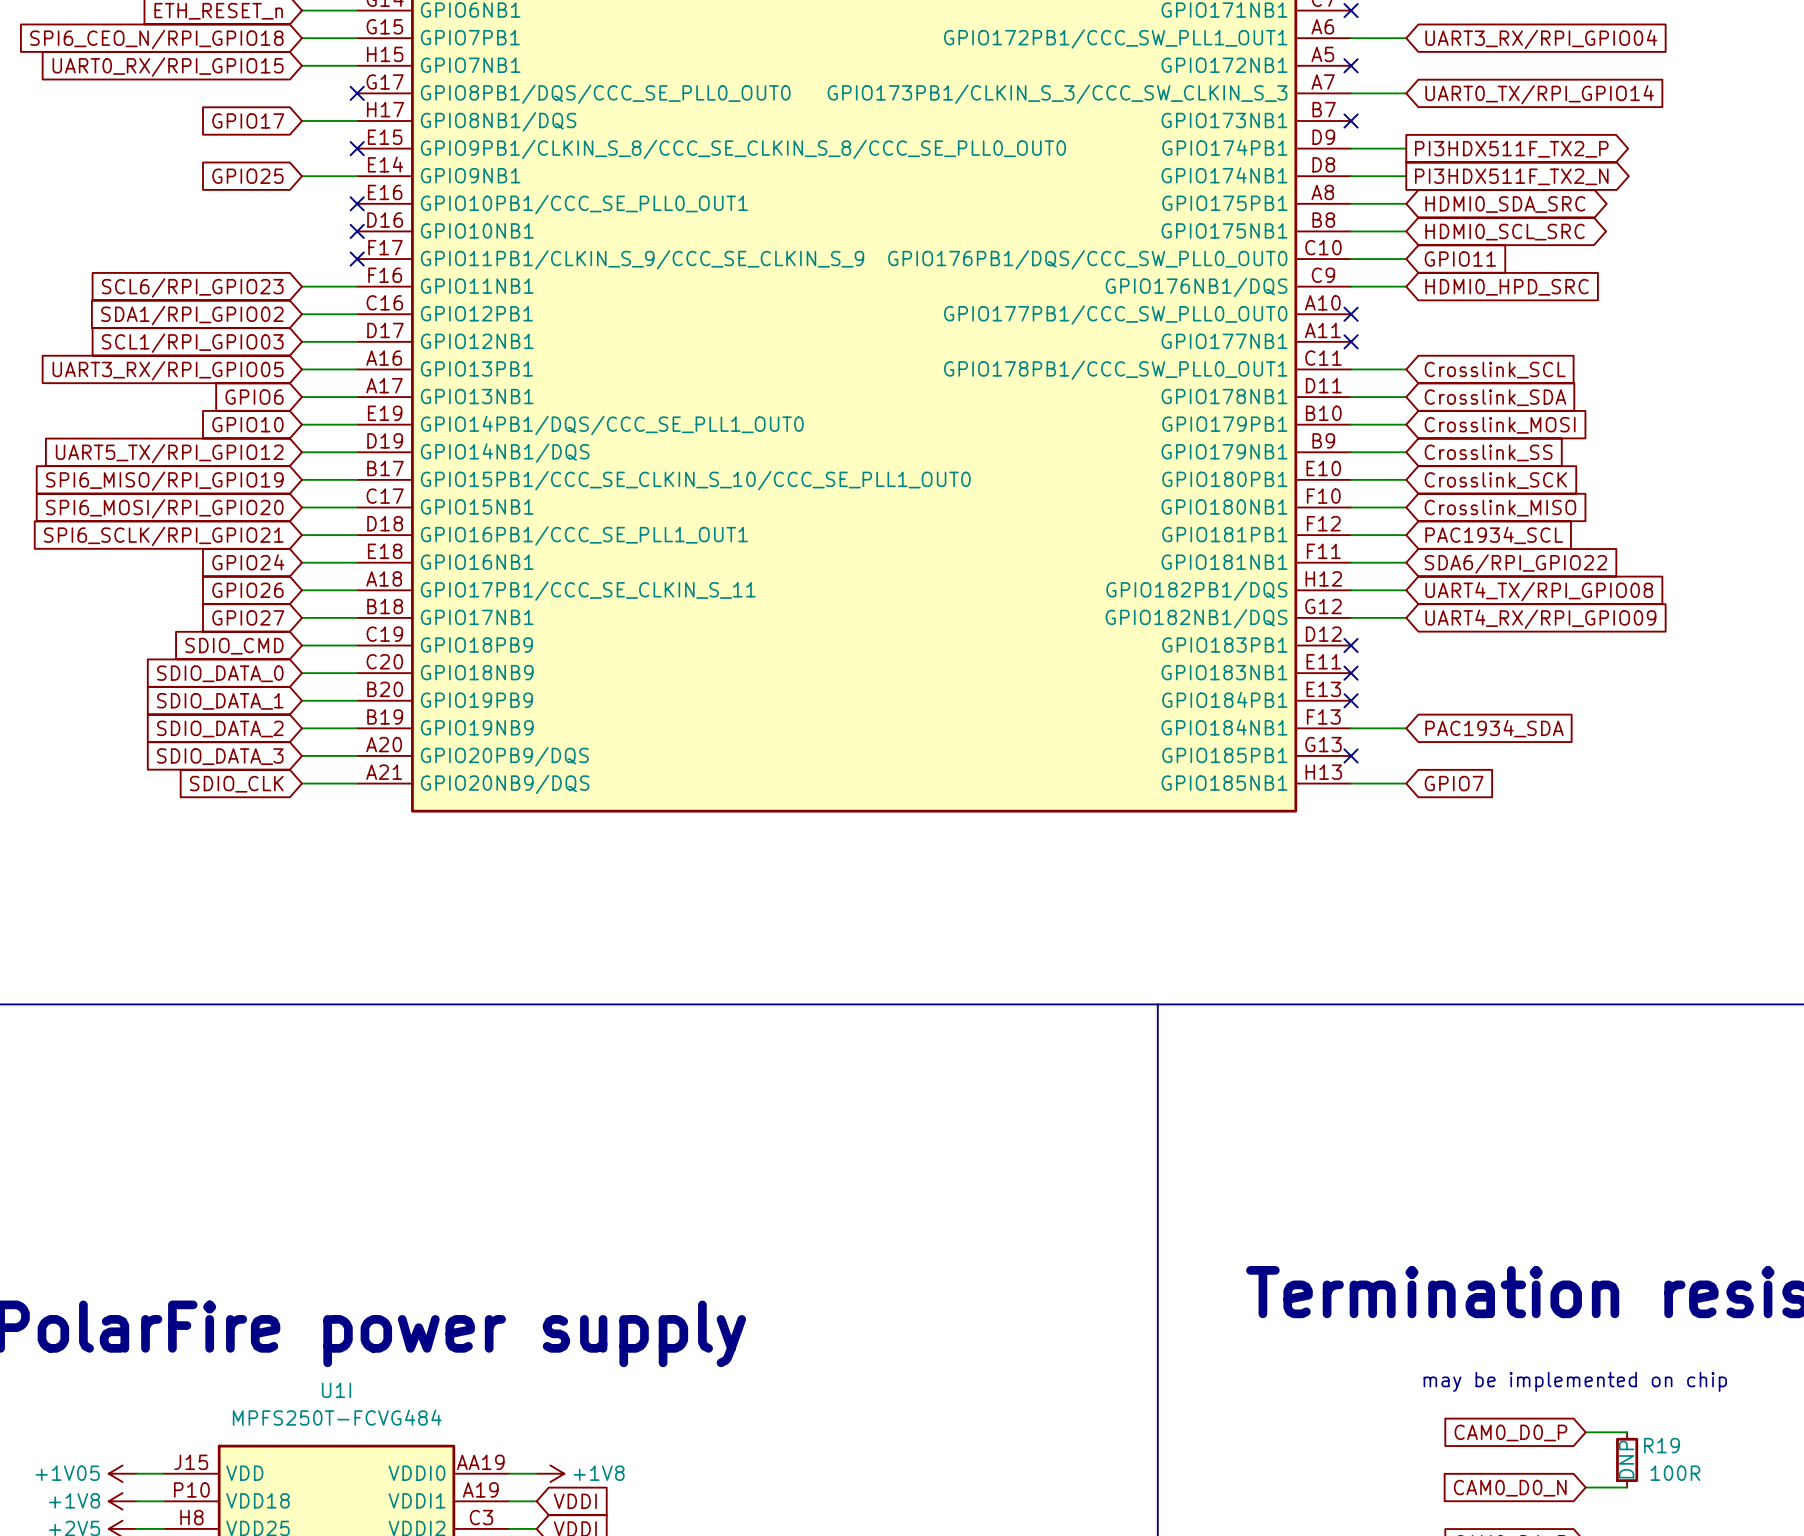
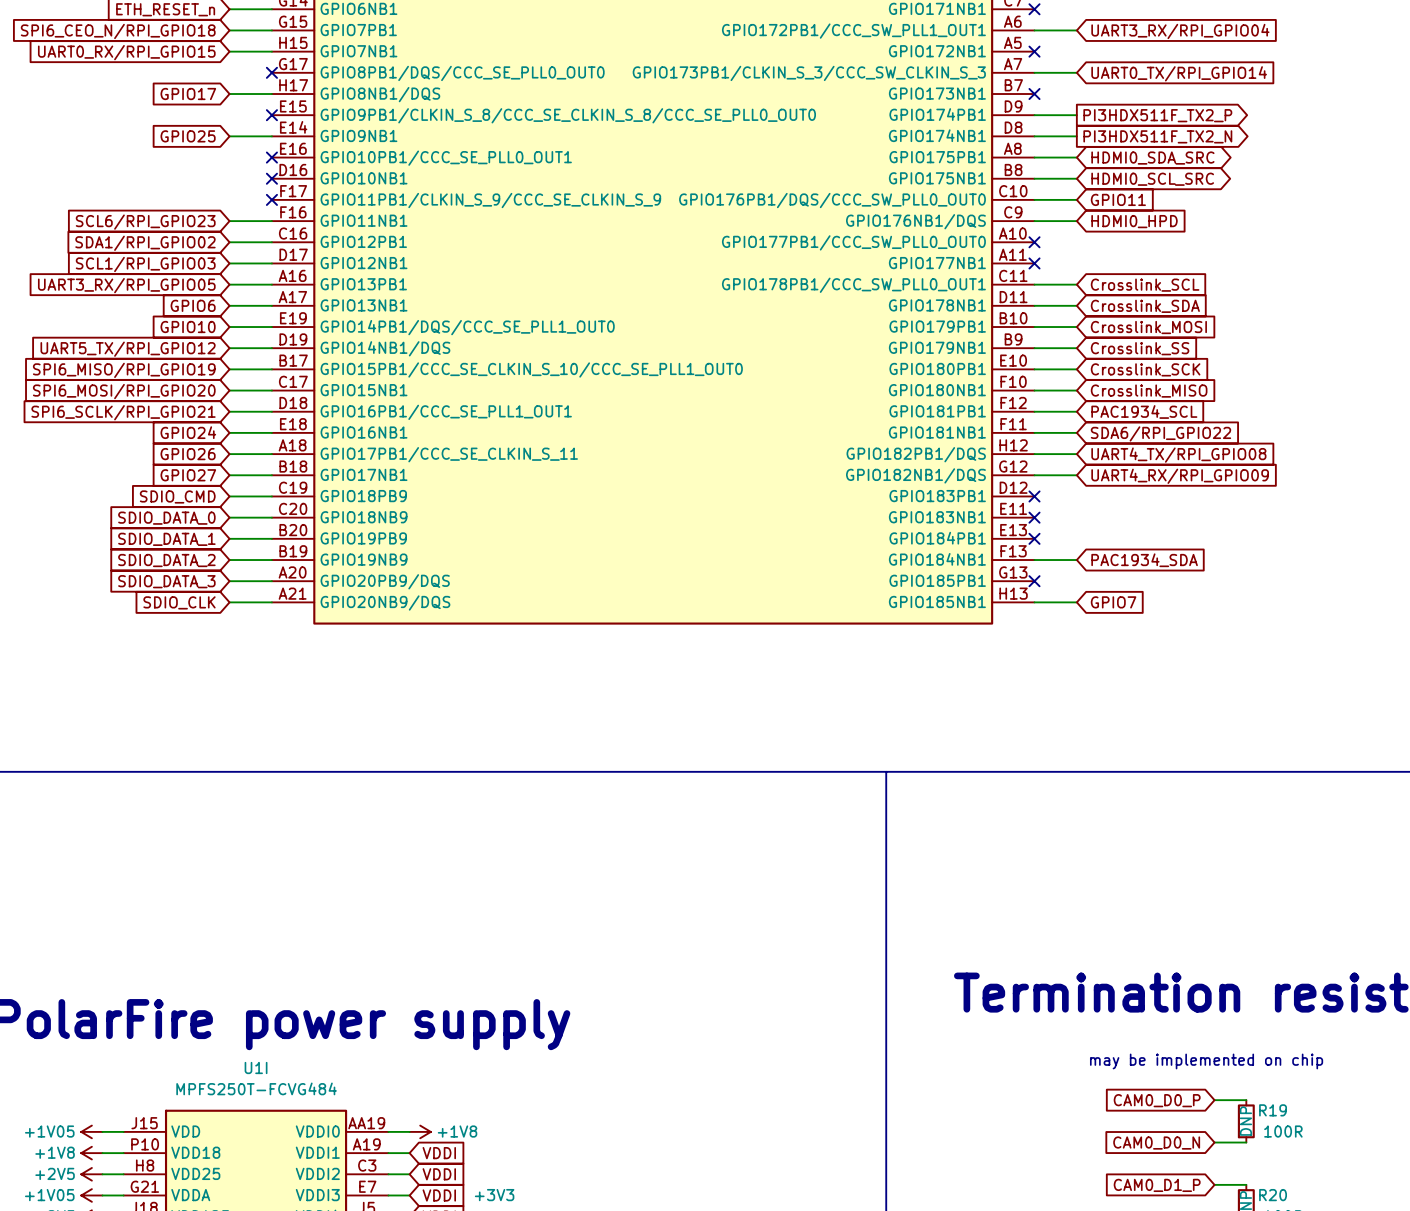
global label: HDMI0_HPD_SRC (1507, 287) -> HDMI0_HPD (1134, 221)

